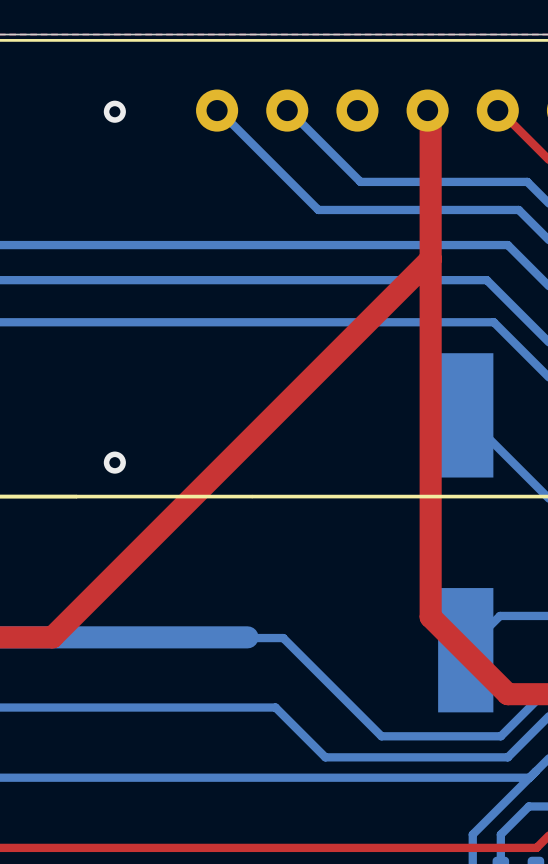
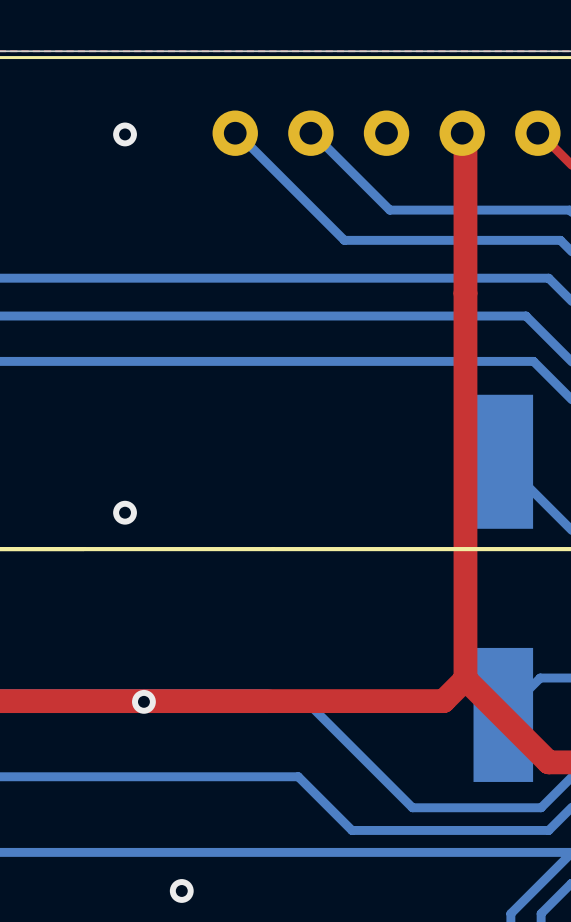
top track: (430, 259) (52, 637) -> (465, 679) (443, 701) (57, 701)
via: none -> (143, 701)
via: none -> (181, 890)

